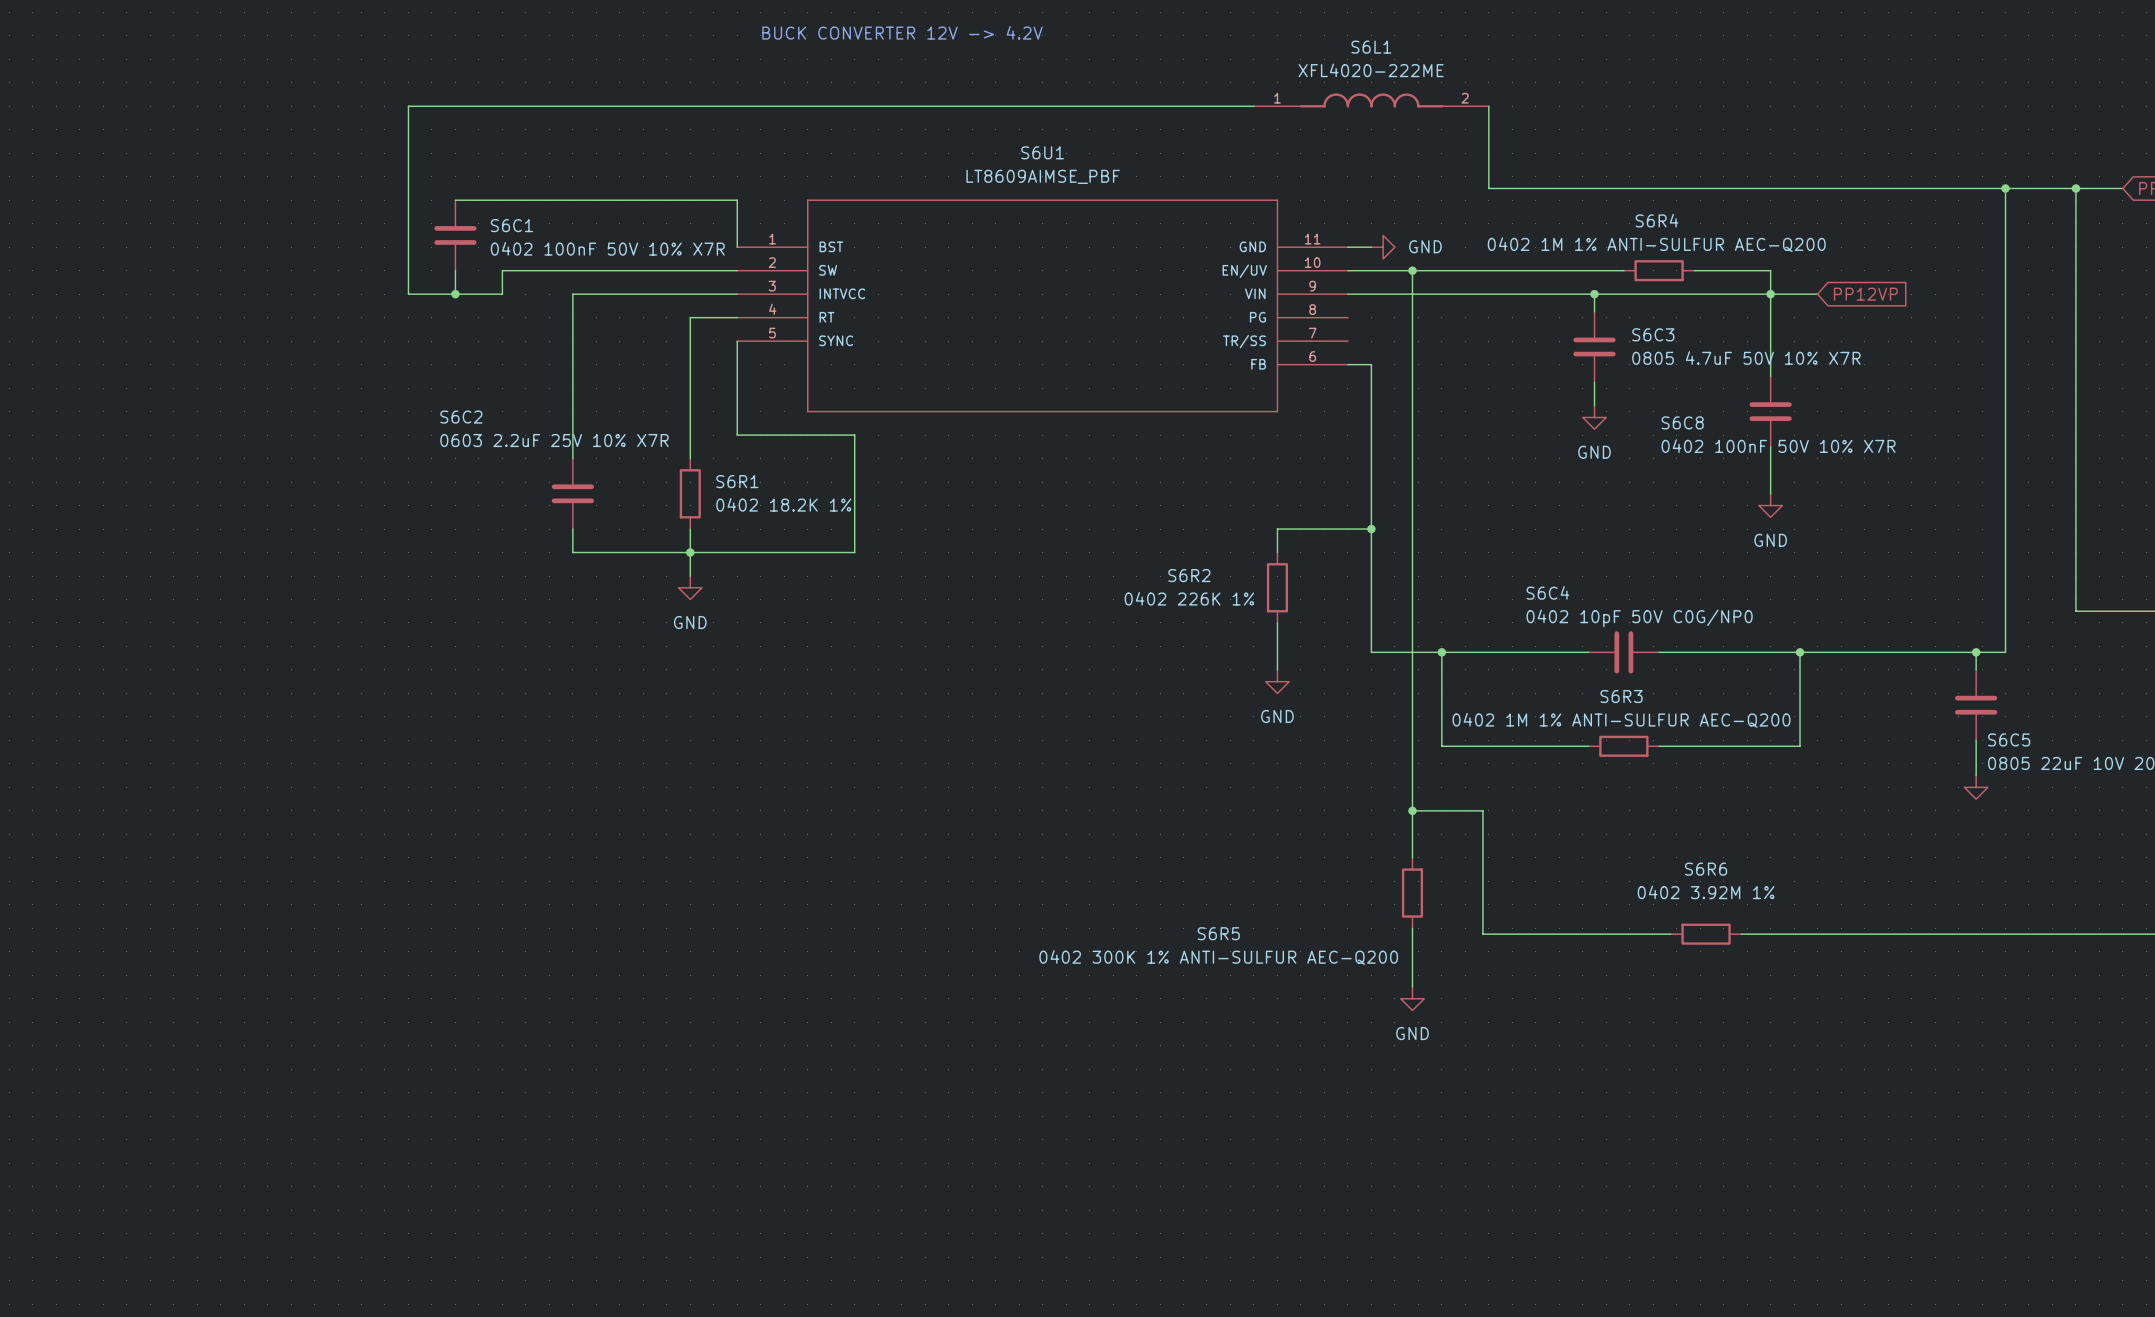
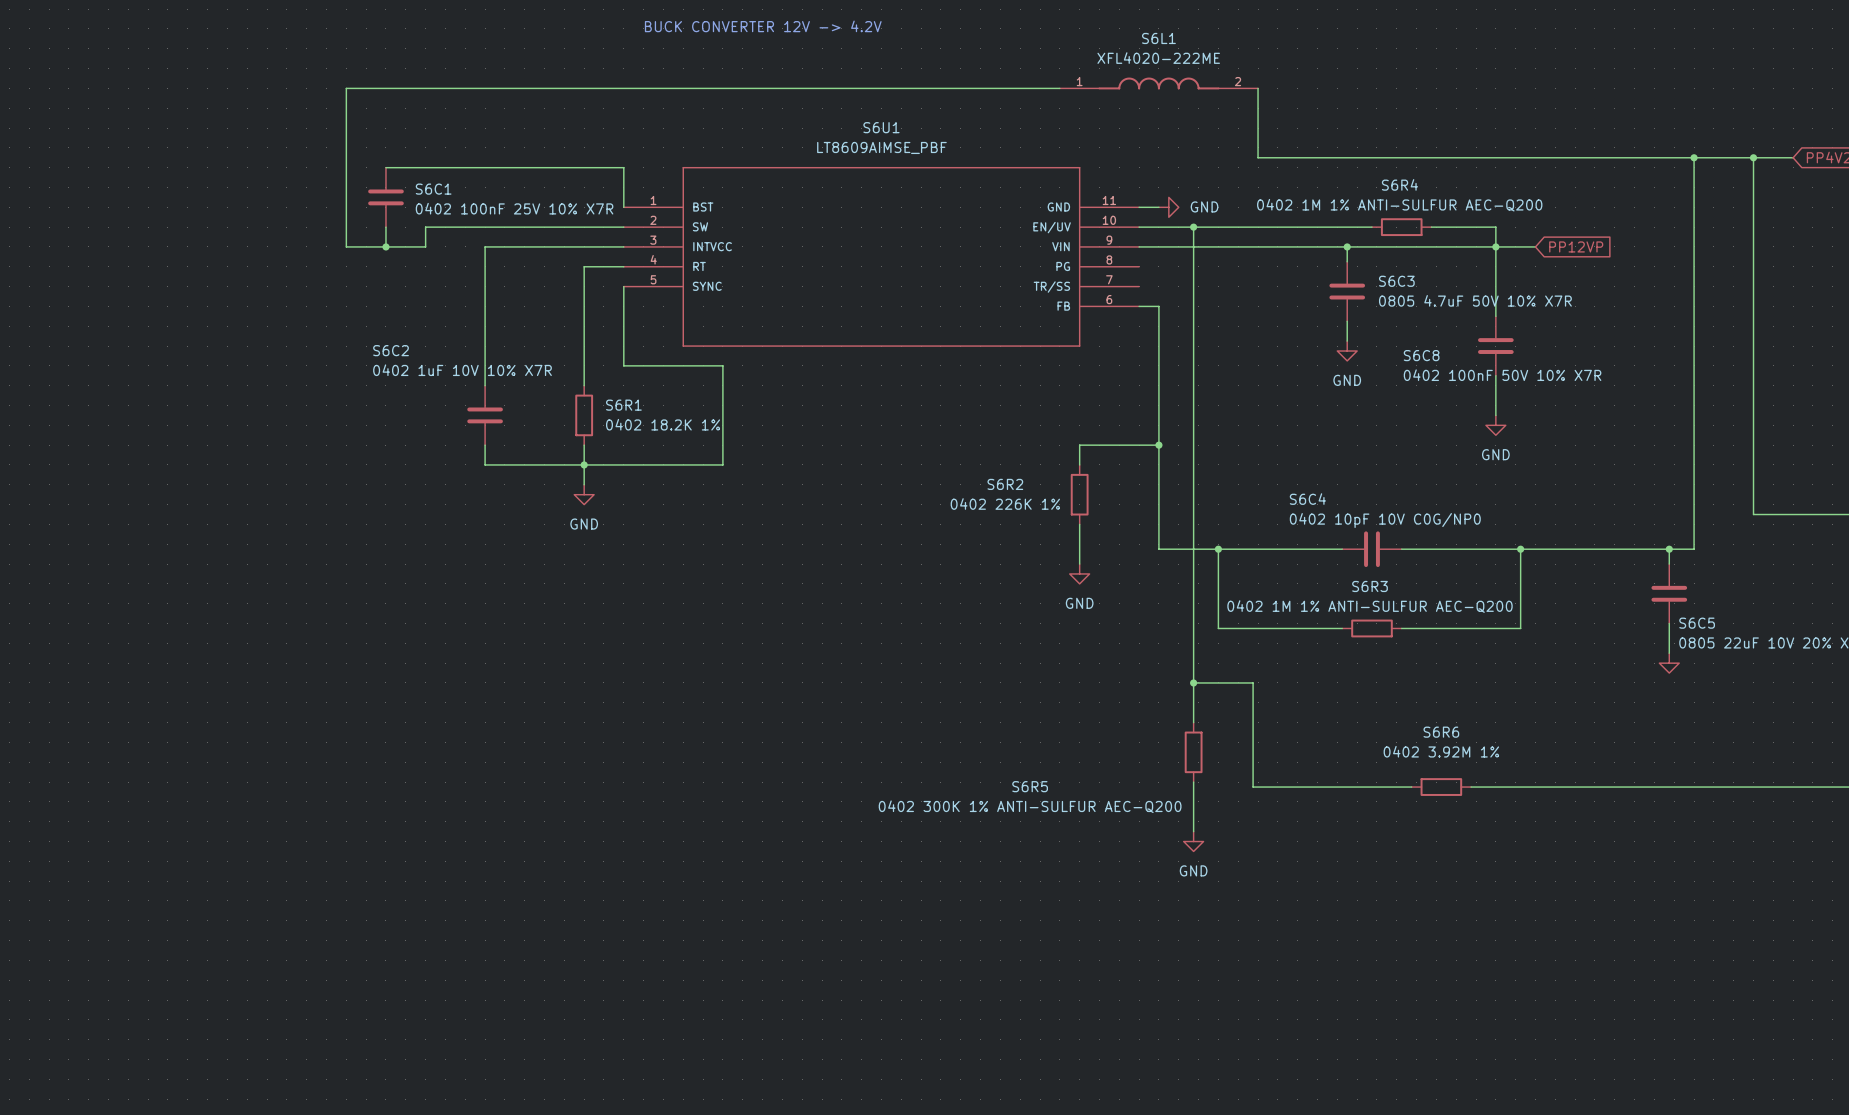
S6C1 value: 0402 100nF 50V 10% X7R (607, 248) -> 0402 100nF 25V 10% X7R (514, 208)
S6C2 value: 0603 2.2uF 25V 10% X7R (554, 440) -> 0402 1uF 10V 10% X7R (462, 370)
S6C4 value: 0402 10pF 50V C0G/NP0 (1639, 618) -> 0402 10pF 10V C0G/NP0 (1385, 520)

